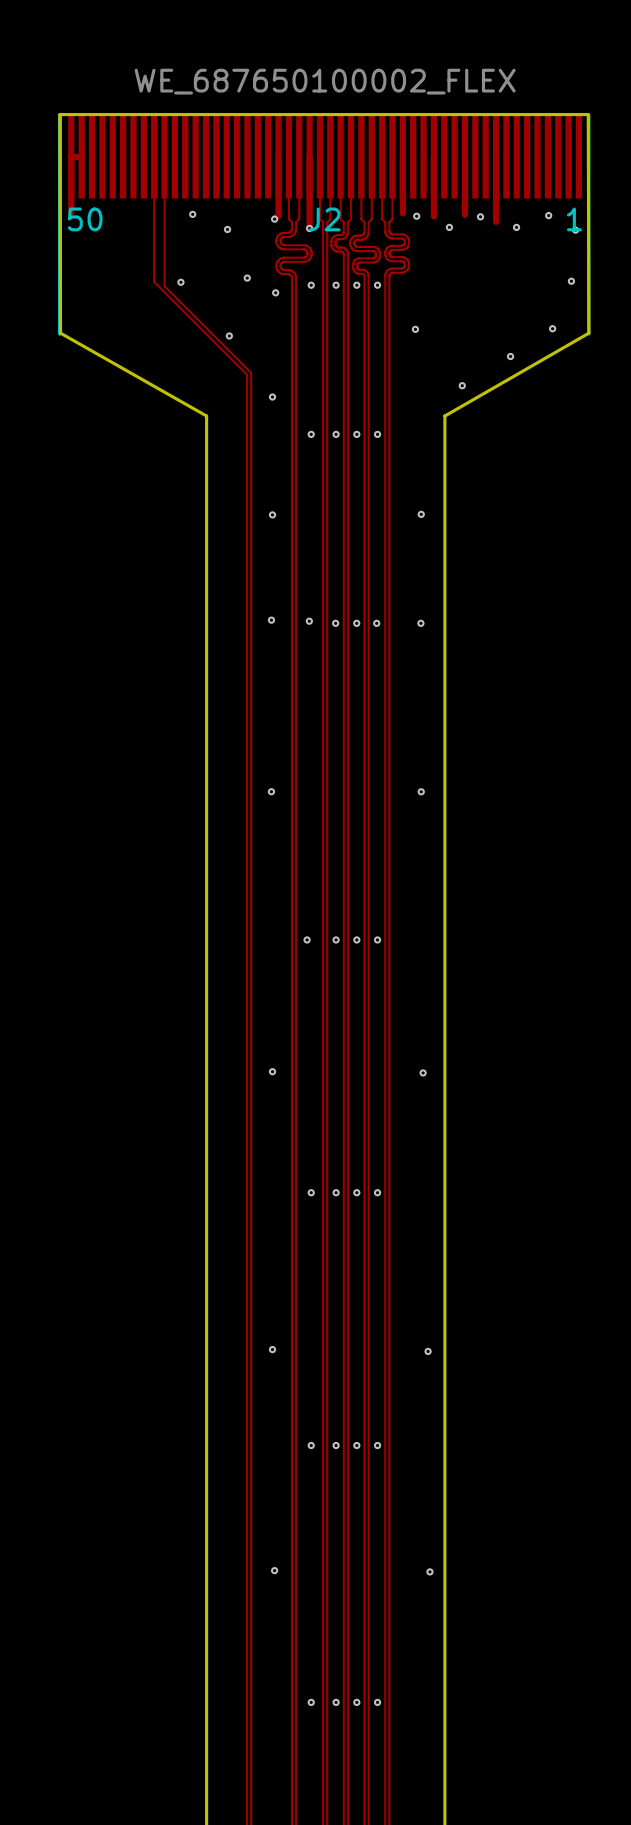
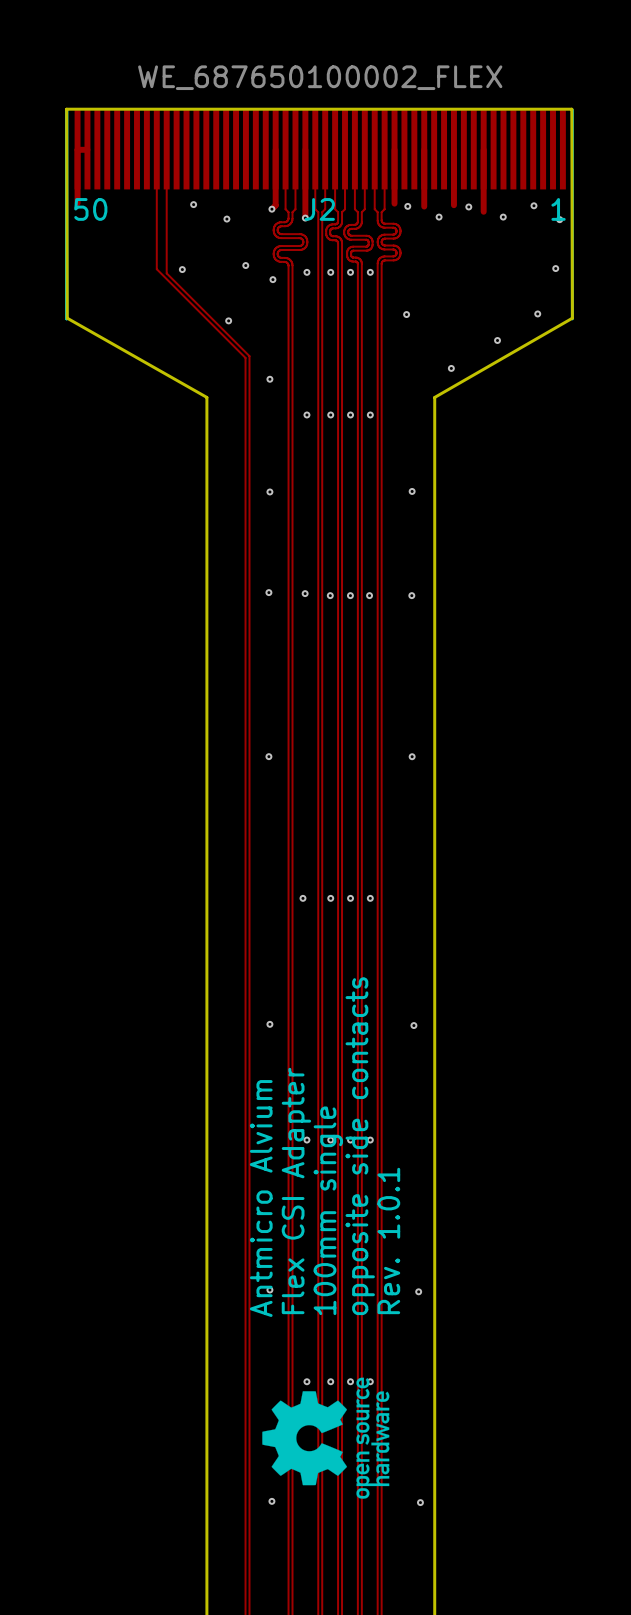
text: none -> opposite side contacts (360, 1146)
text: none -> Flex CSI Adapter (296, 1190)
text: none -> Antmicro Alvium (261, 1198)
text: none -> 100mm single (328, 1210)
text: none -> Rev. 1.0.1 (388, 1240)
drawing: none -> [262, 1377, 390, 1499]

